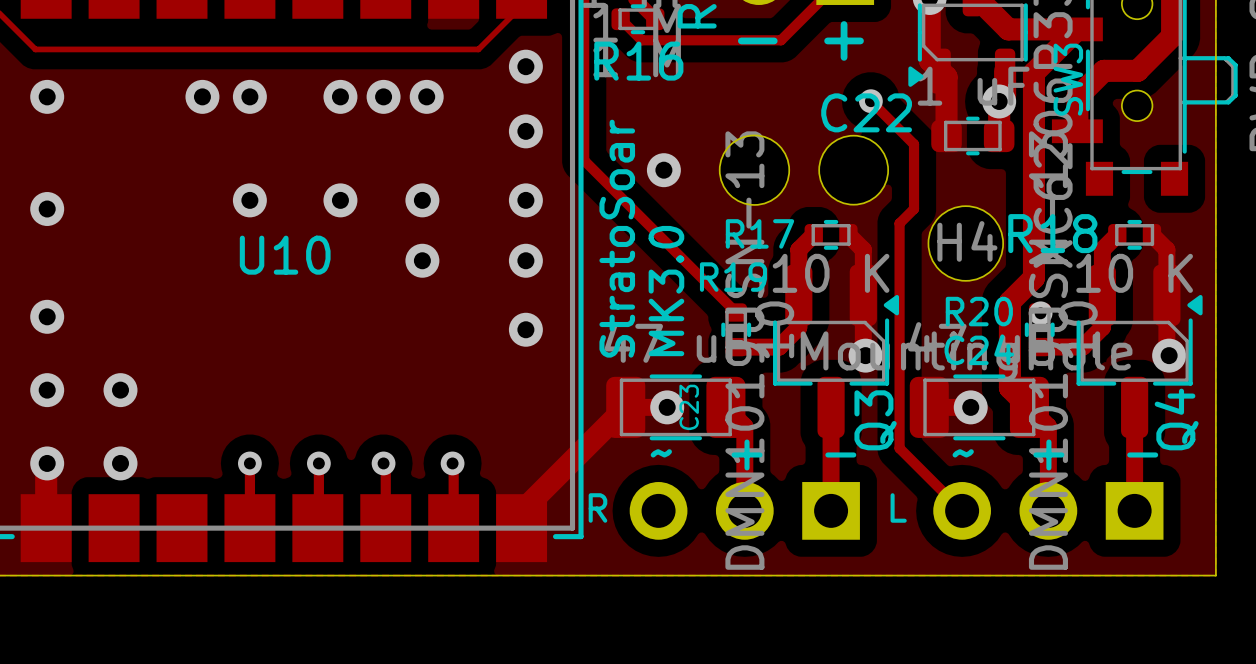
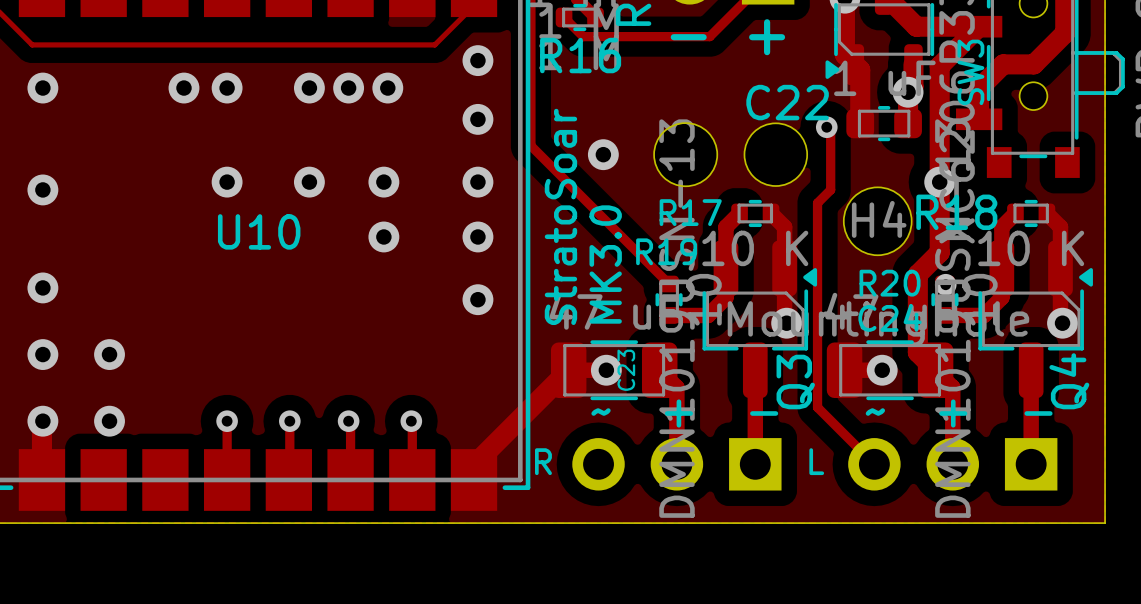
track: (870, 101) (909, 140) -> none
via position: (870, 101) -> (826, 127)
via: none -> (939, 182)

